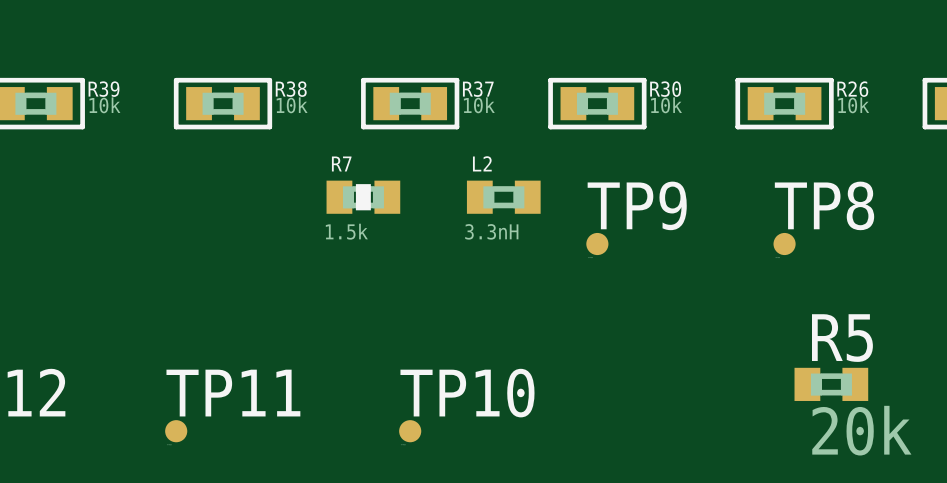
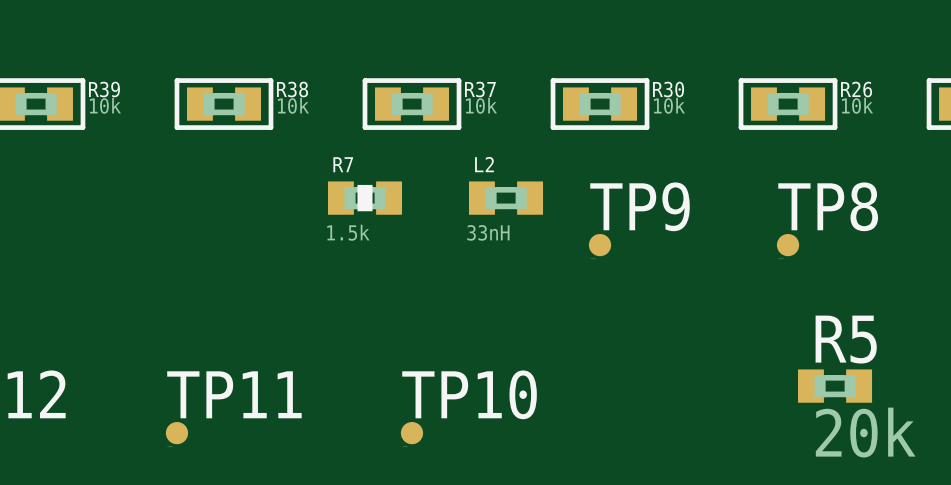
L2 value: 3.3nH (491, 231) -> 33nH (488, 232)

